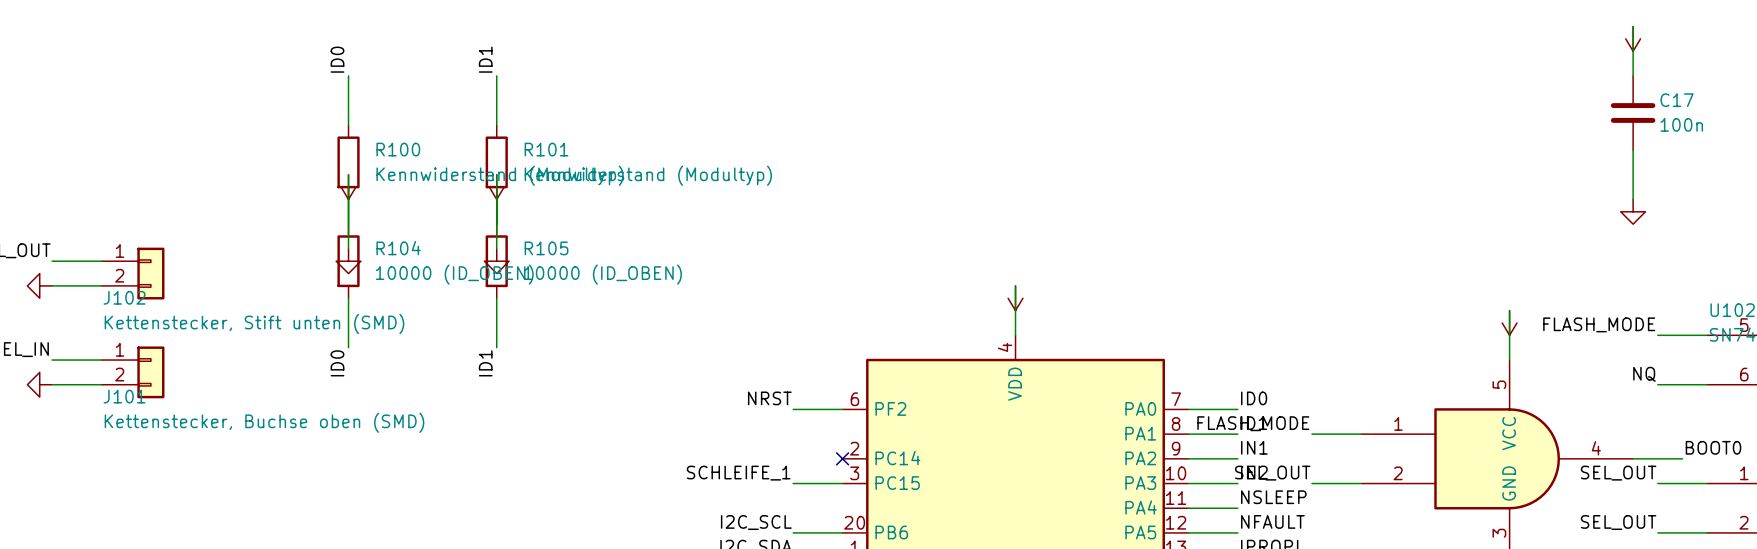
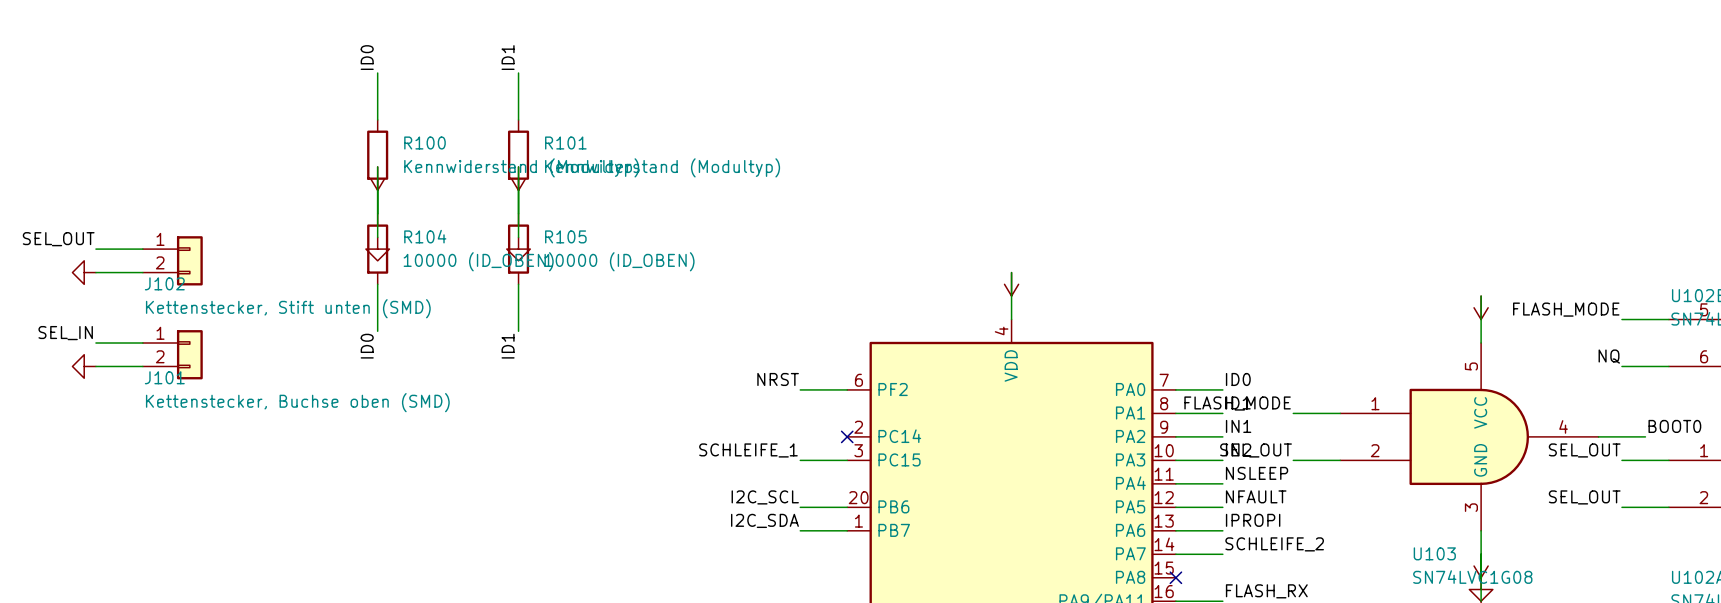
wire: (1633, 26) (1633, 75) -> none
power symbol: (1633, 38) -> none
C17: 100n (1633, 112) -> none
wire: (1633, 150) (1633, 199) -> none
power symbol: (1633, 211) -> none

